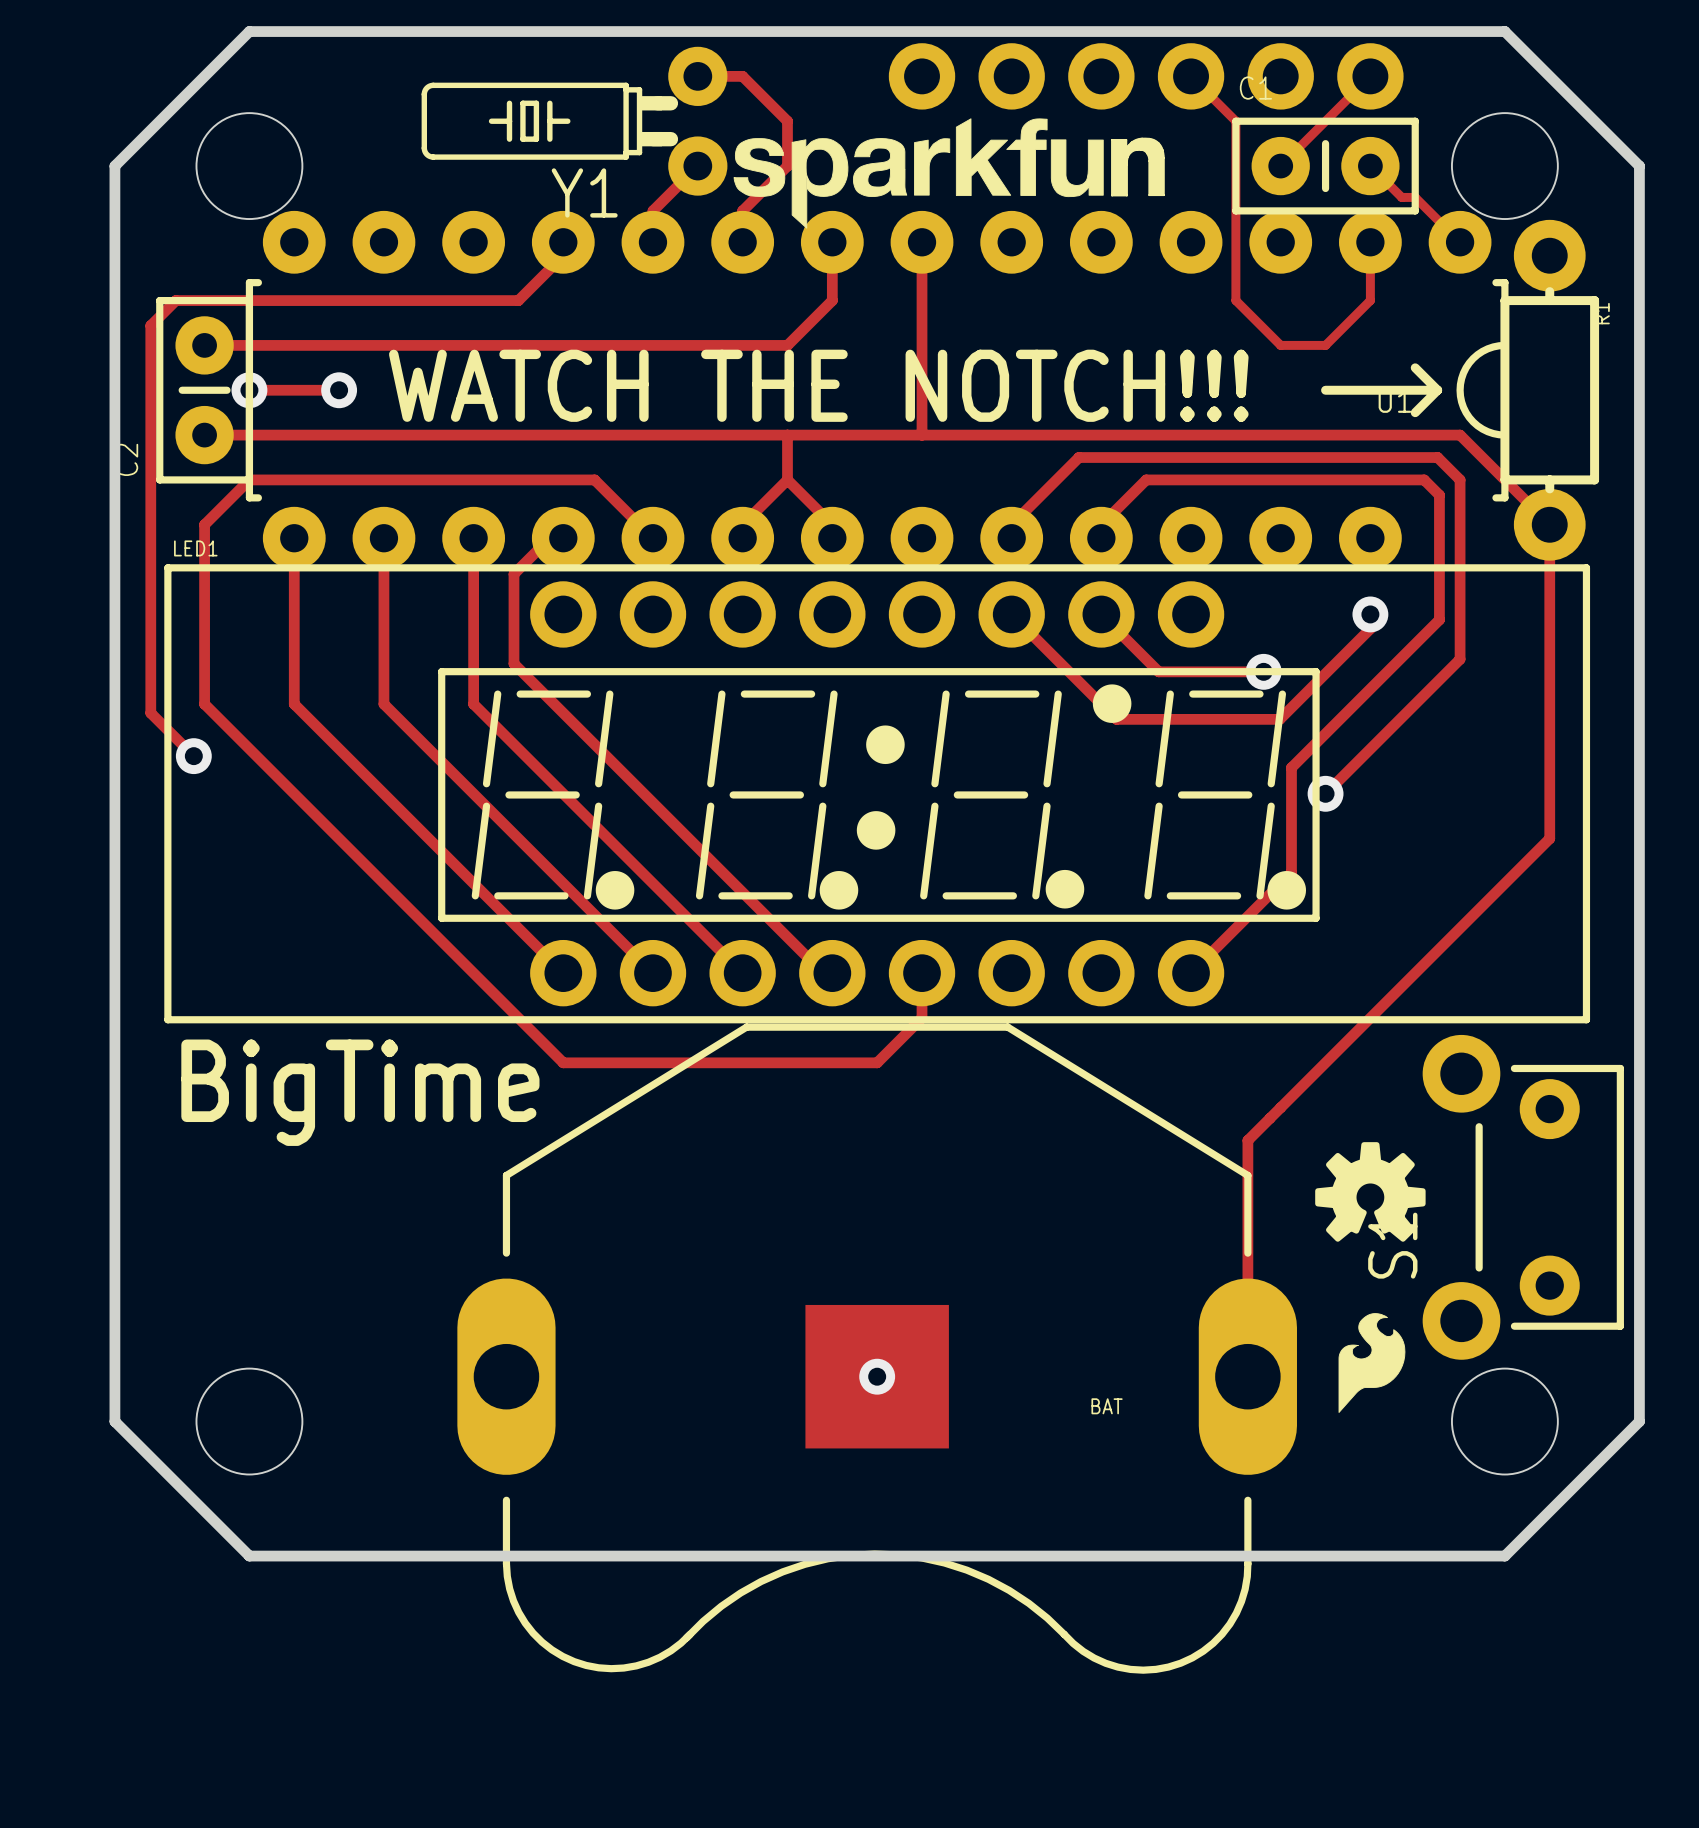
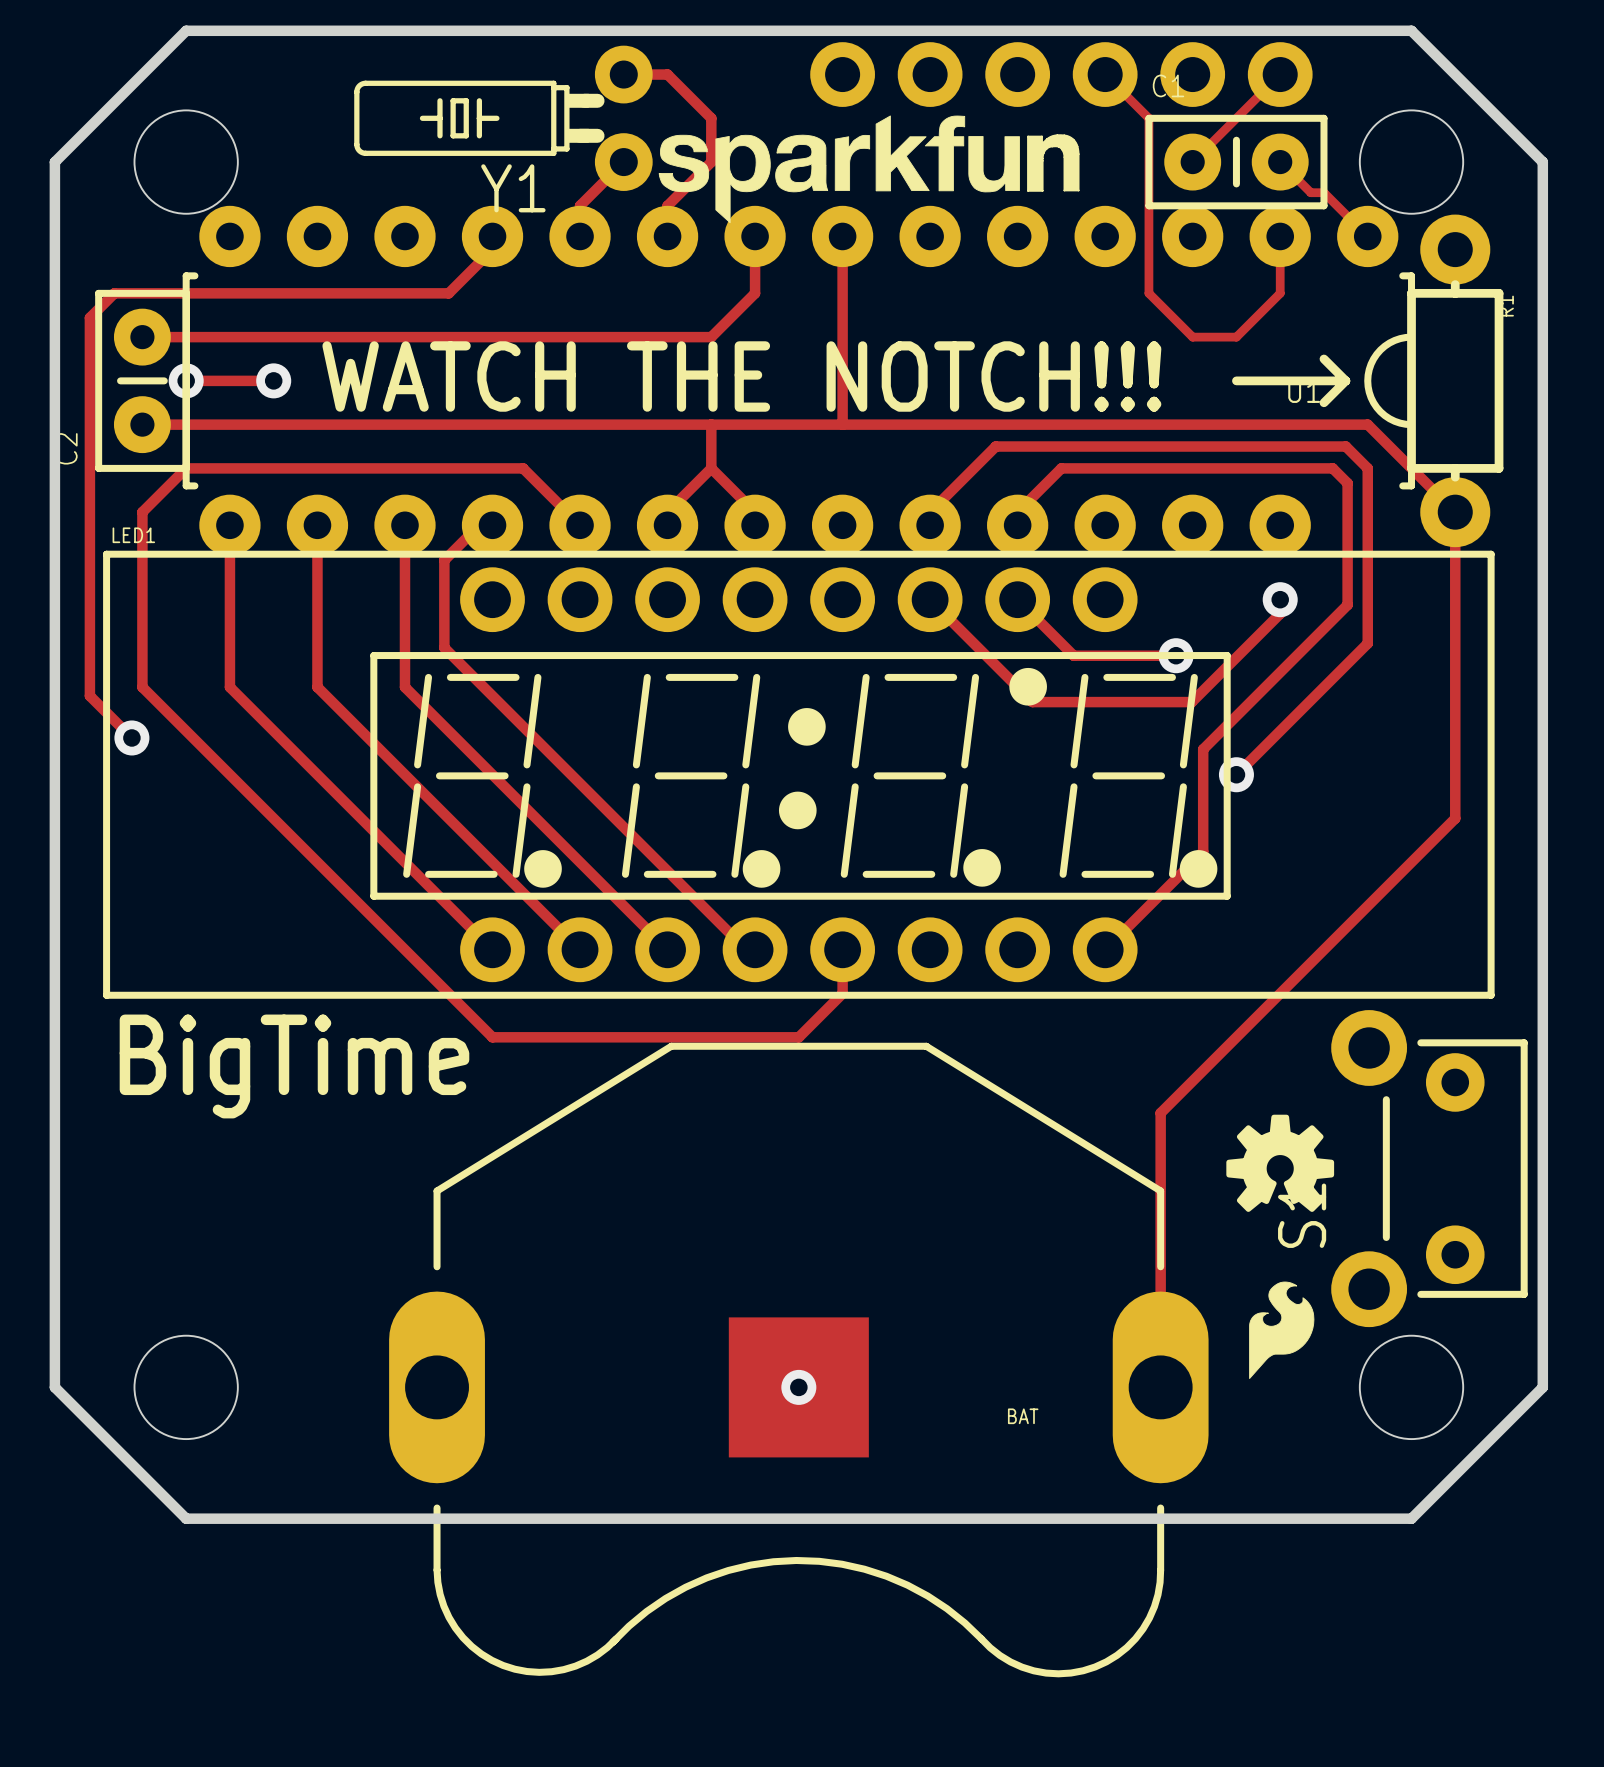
BAT position: (877, 1348) -> (798, 1360)
via position: (877, 1376) -> (798, 1387)

